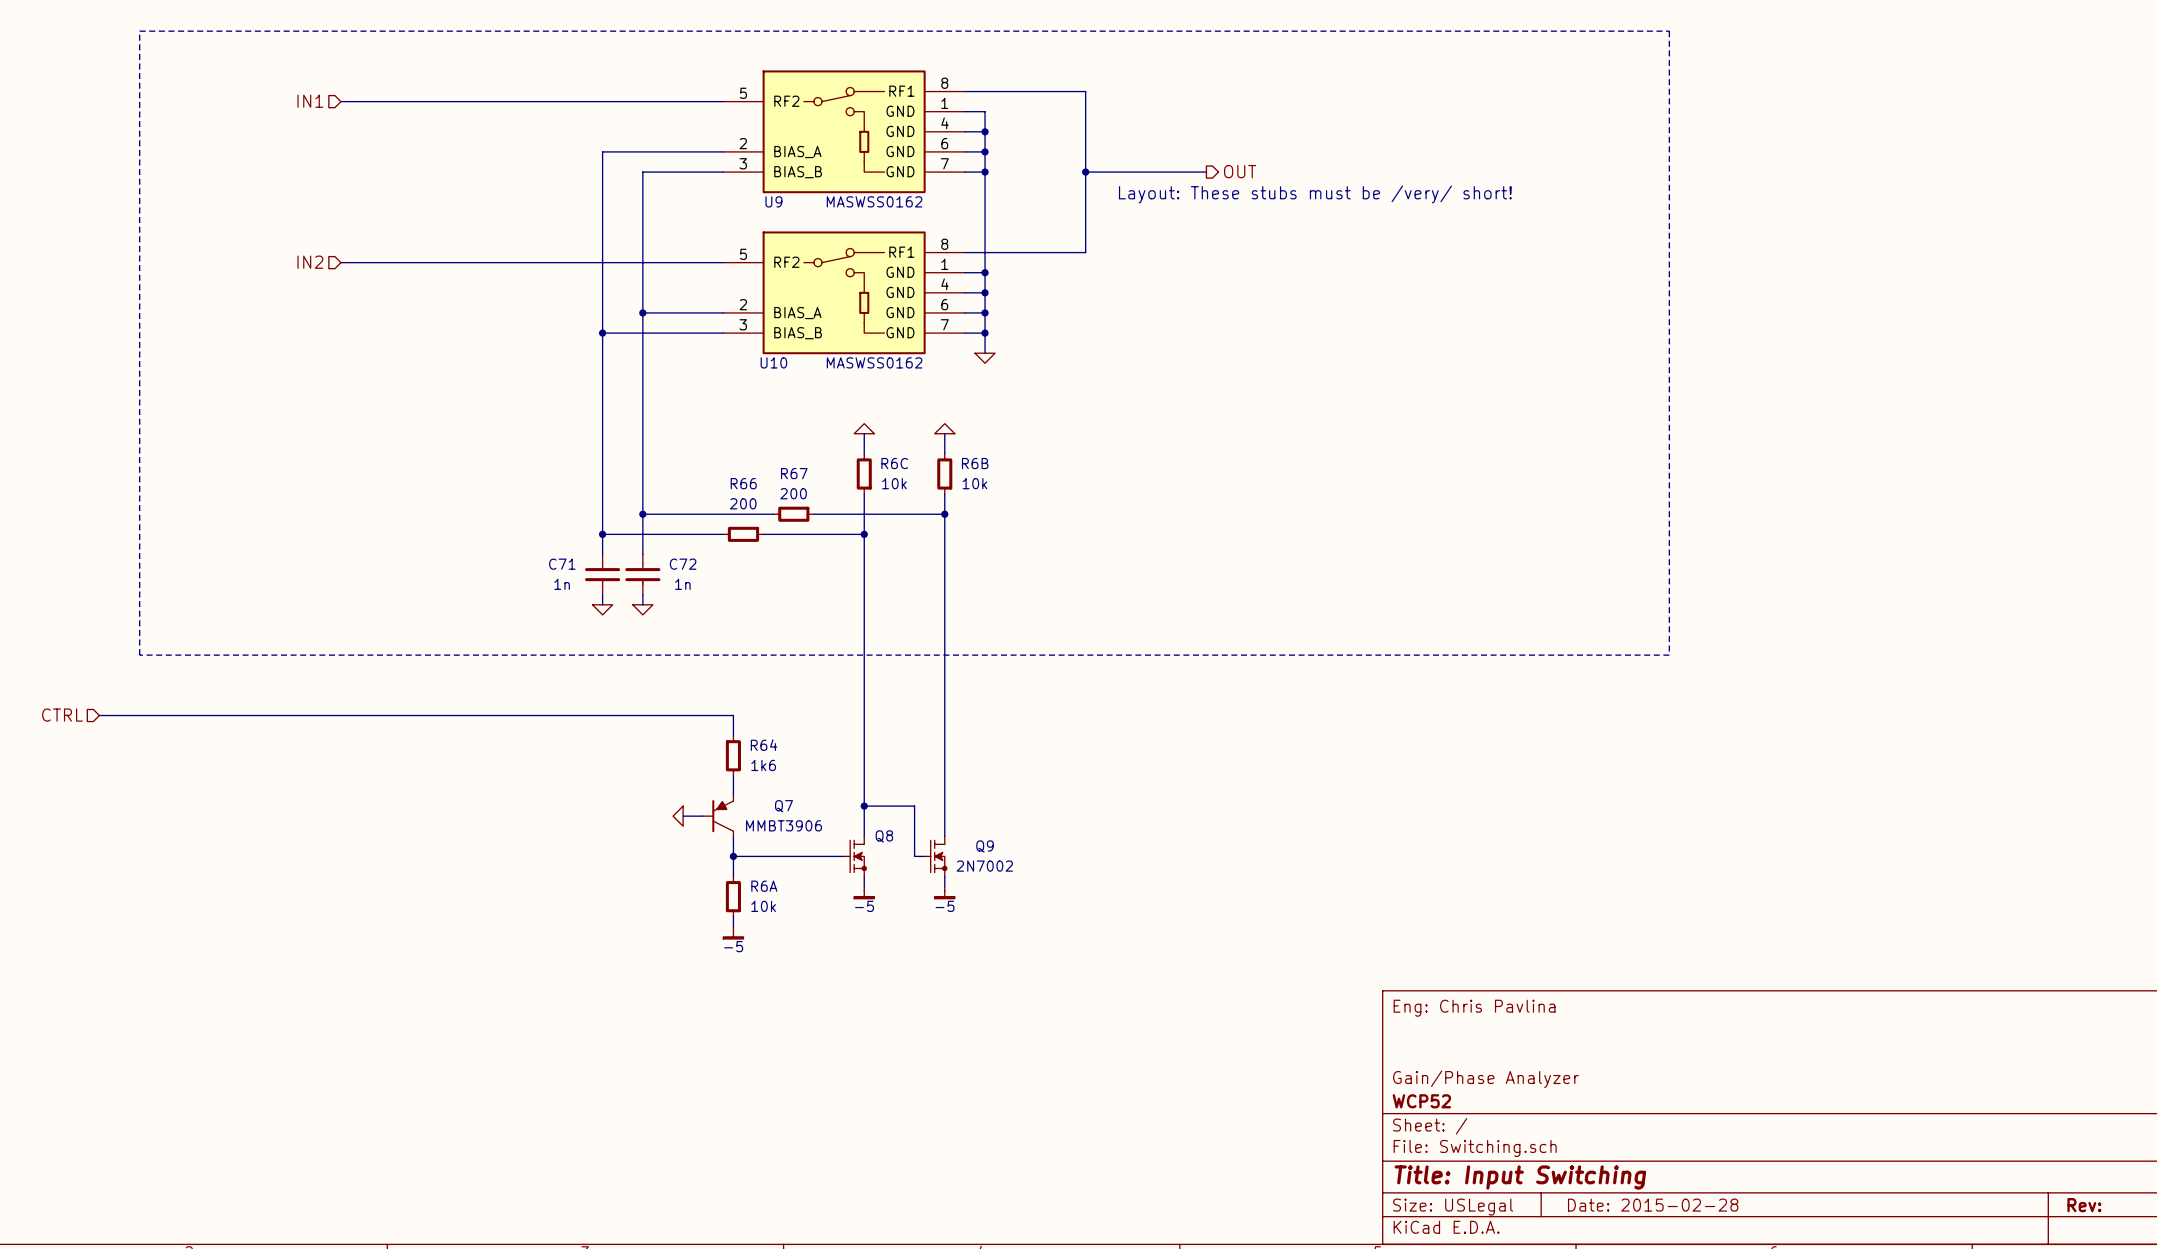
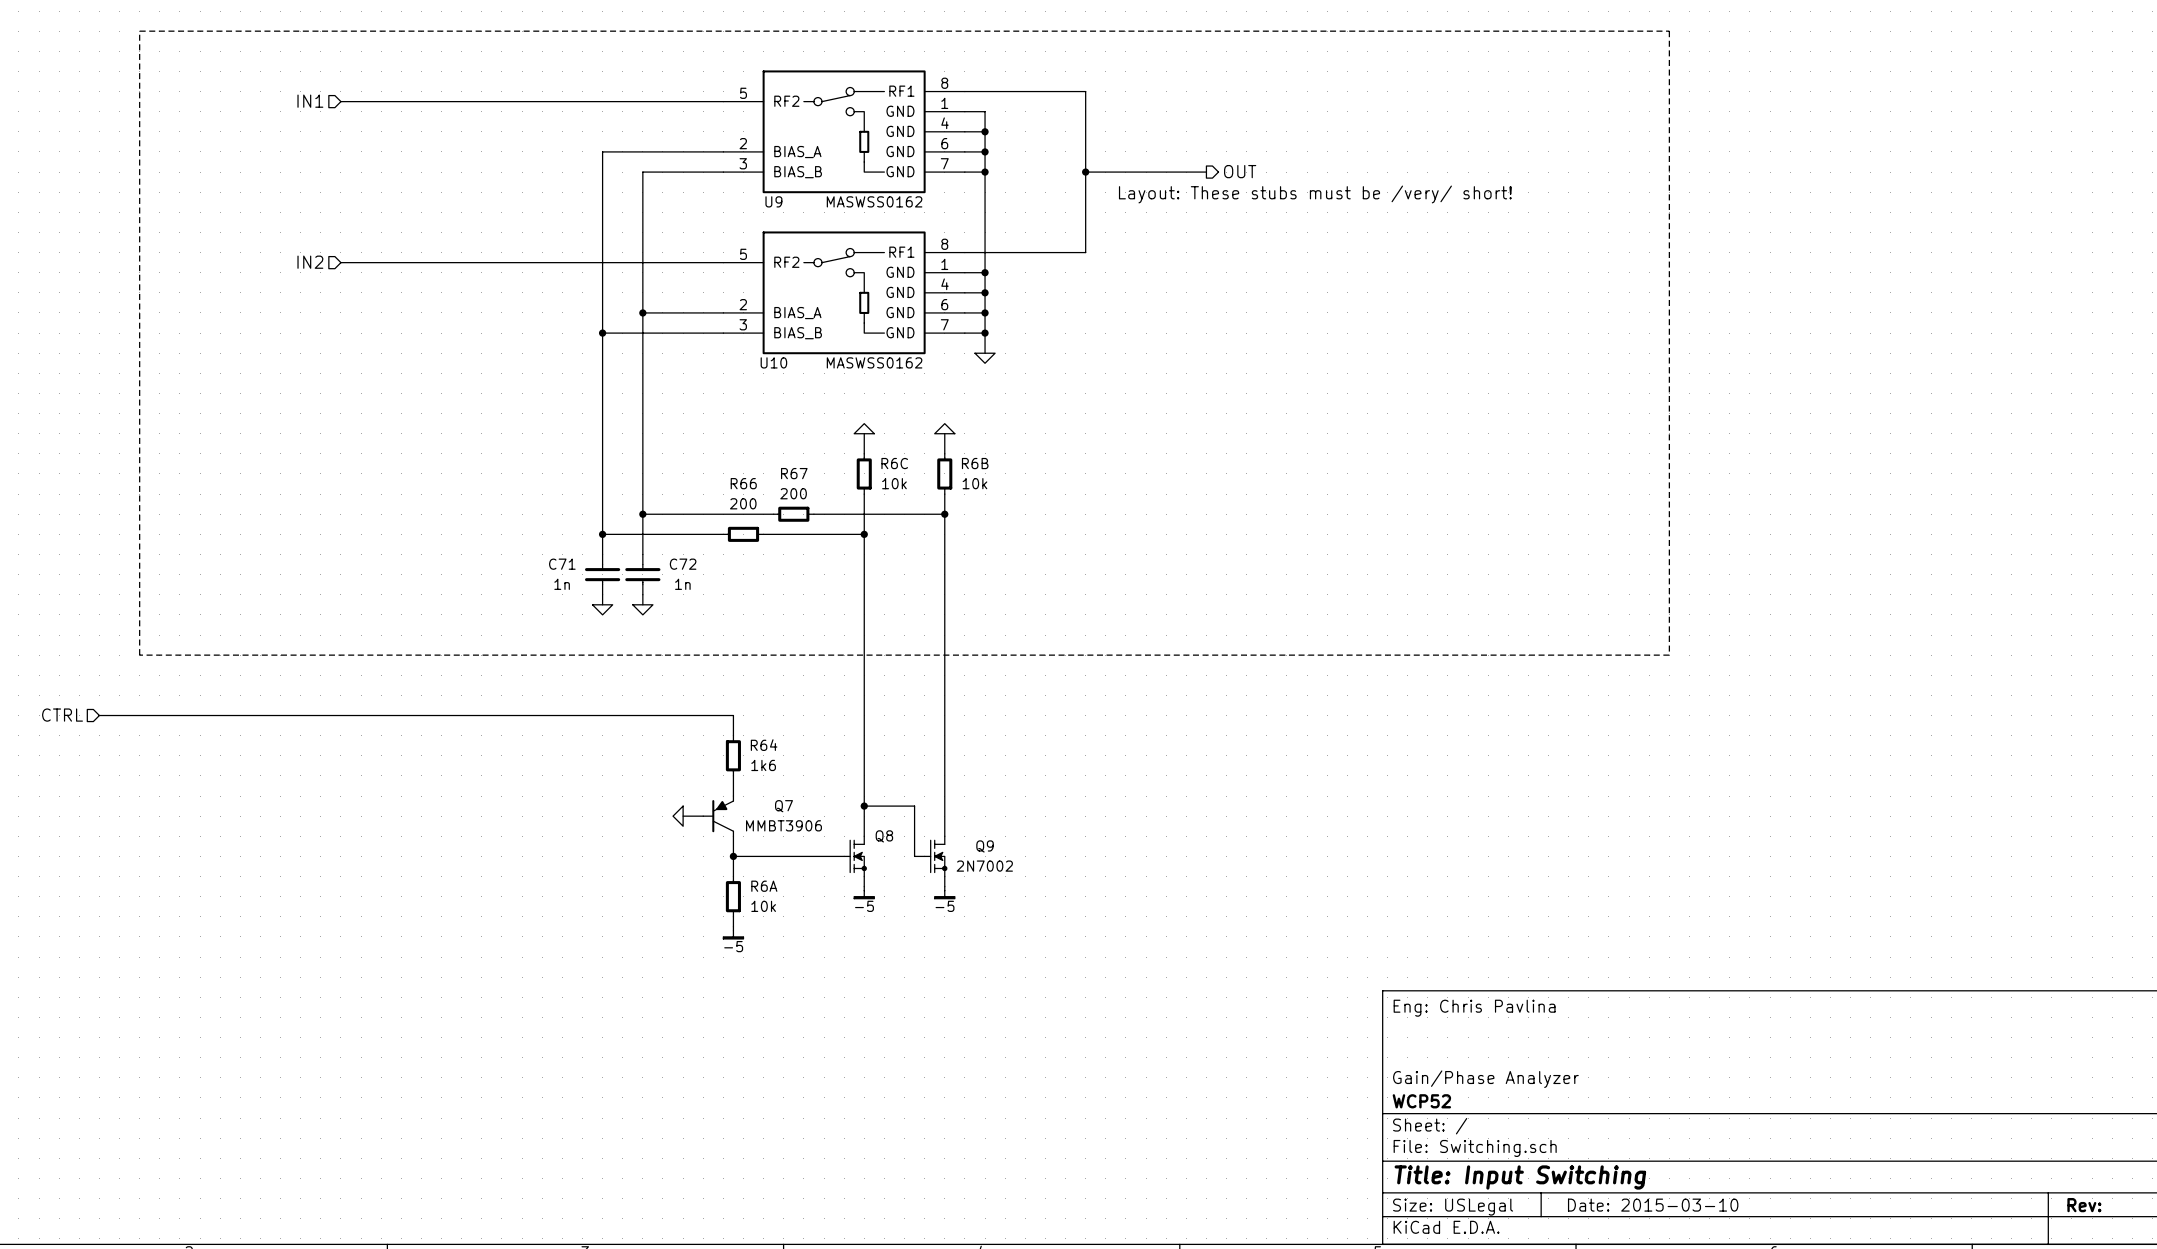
title block: Date: 2015-02-28 (1653, 1205) -> Date: 2015-03-10 (1653, 1205)

